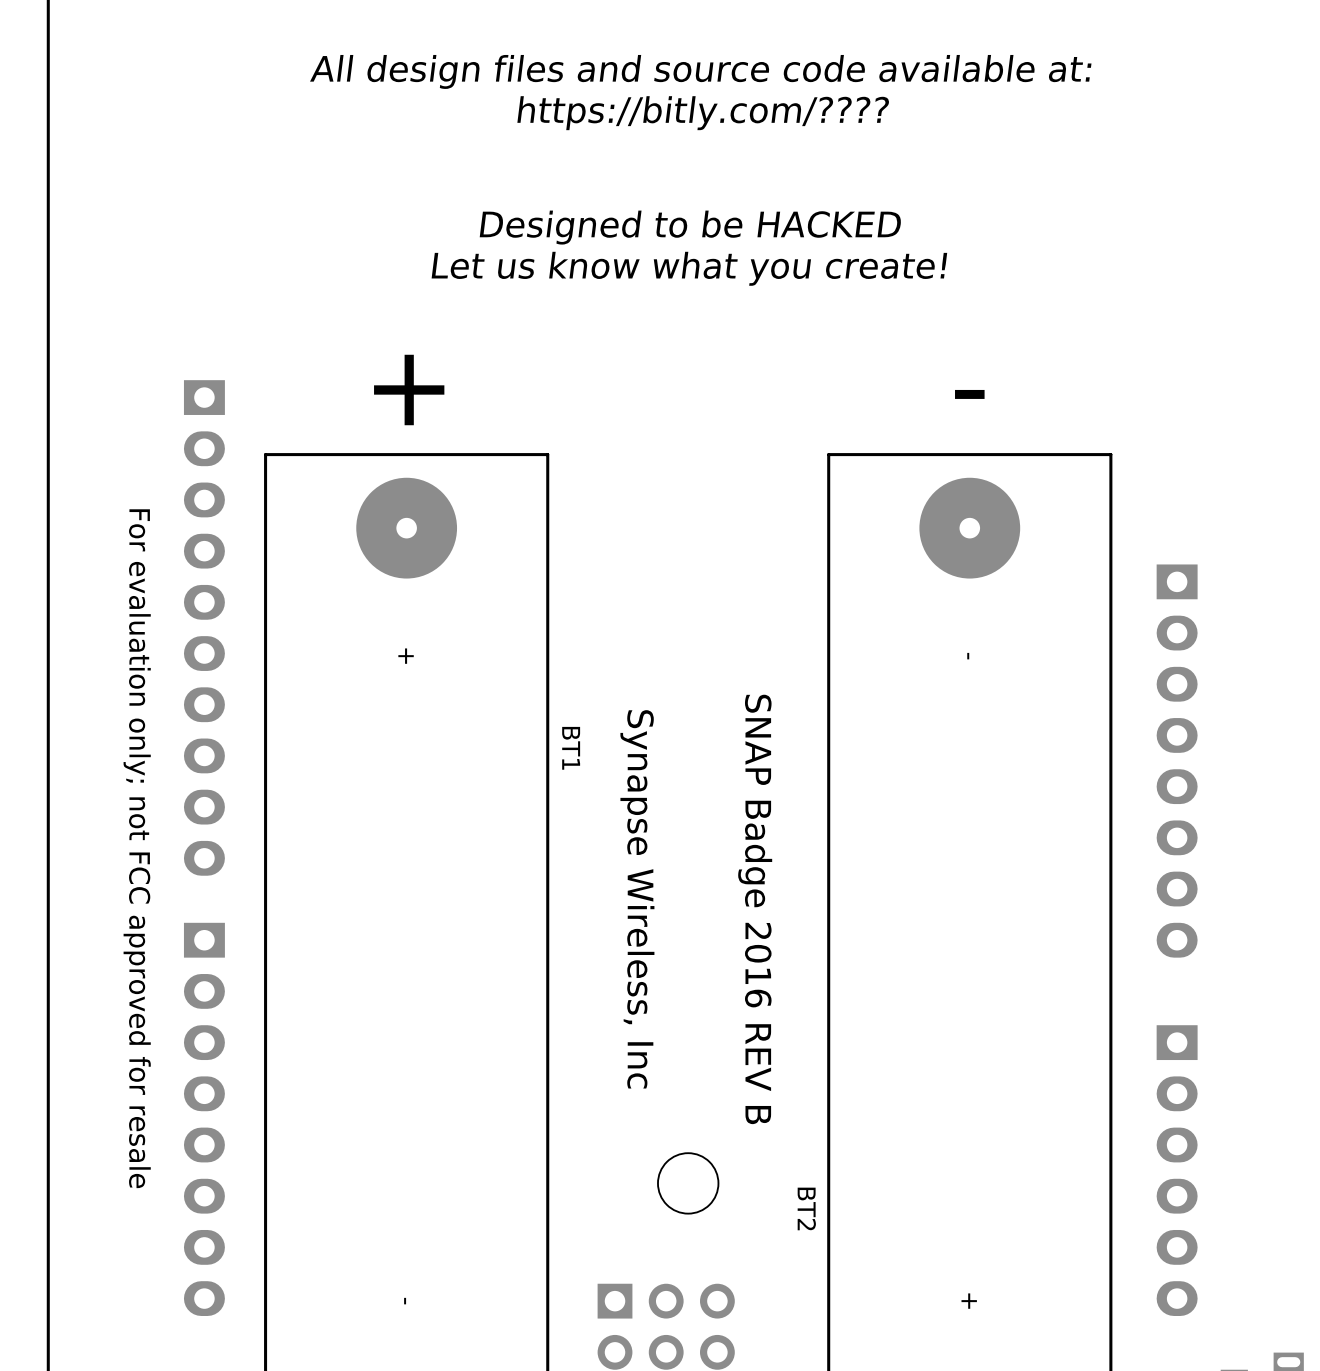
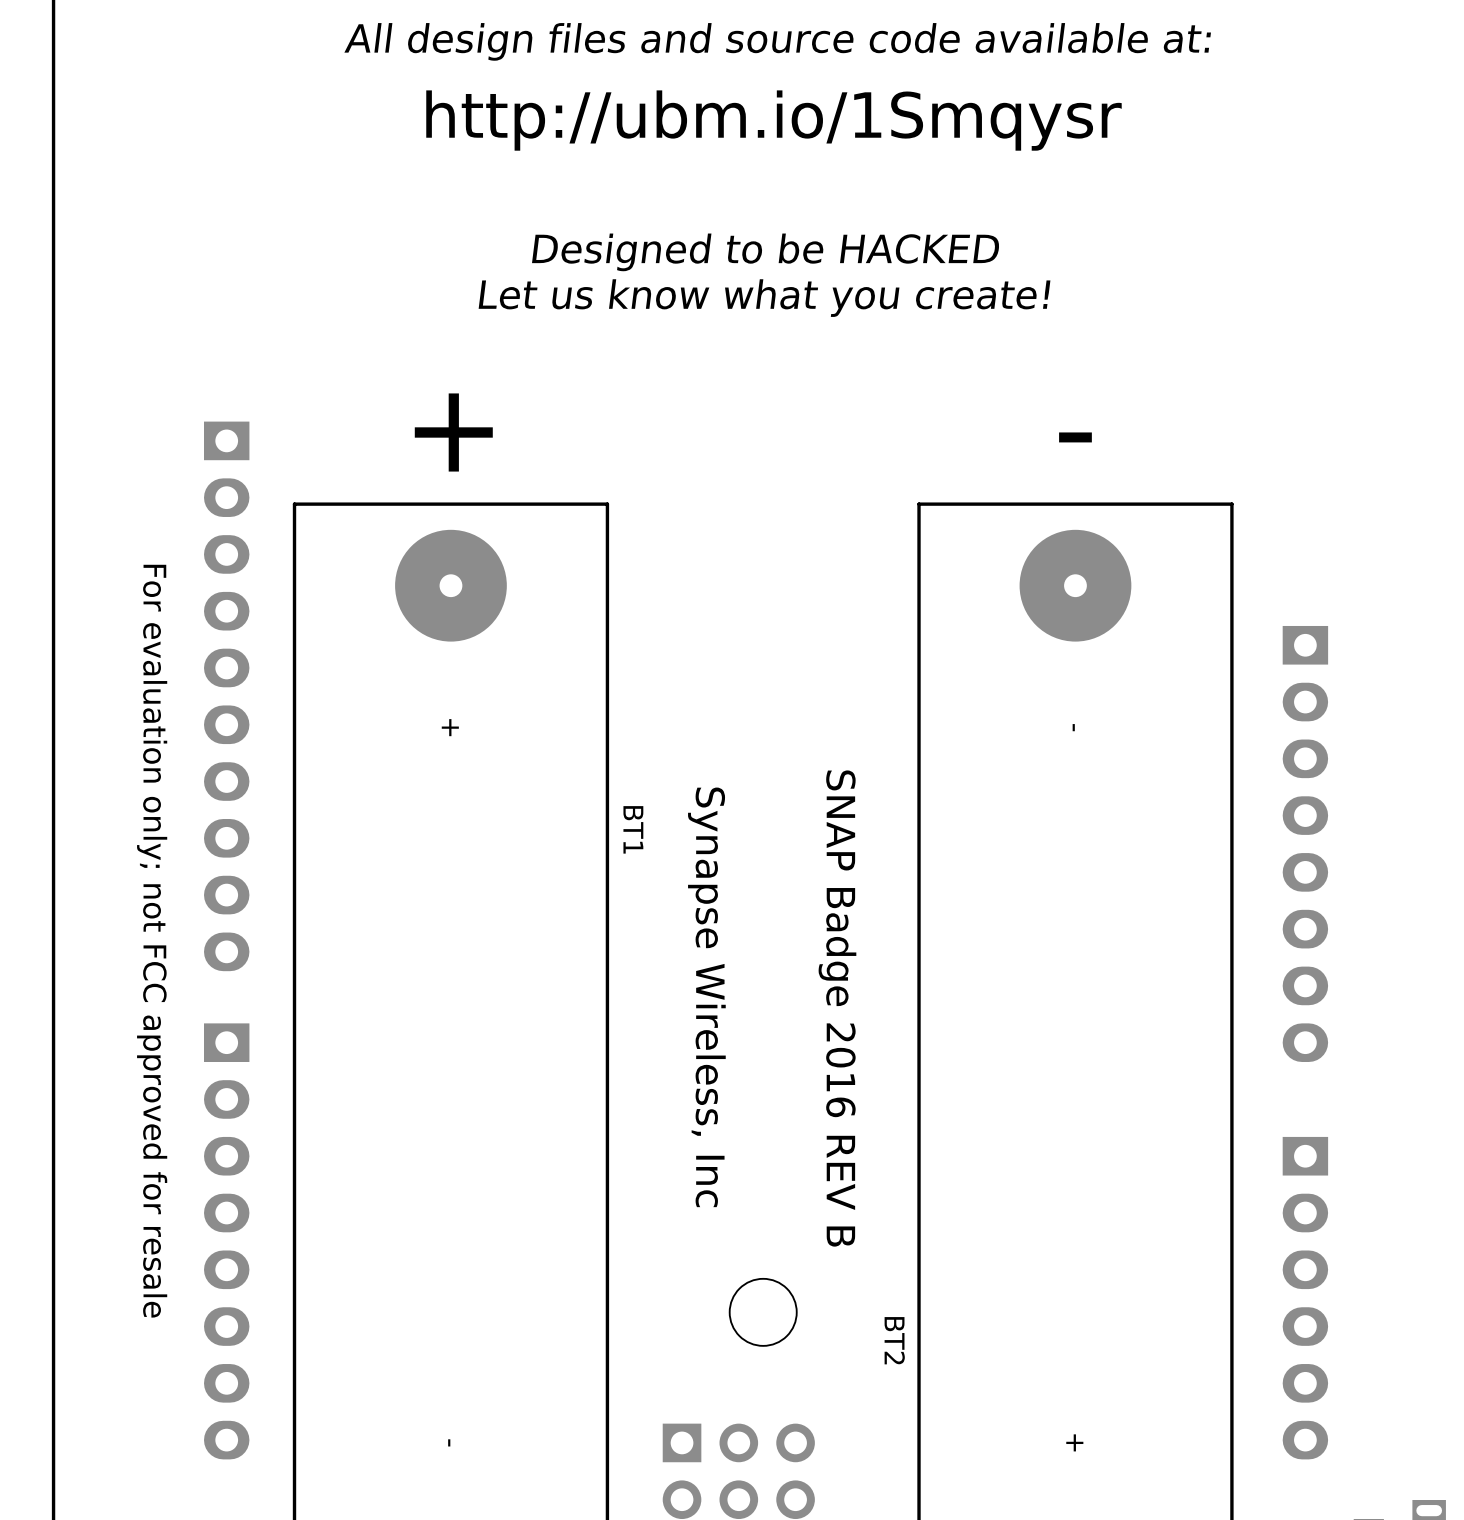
text position: All design files and source code available at: (700, 71) -> All design files and source code available at: (777, 41)
text: https://bitly.com/???? (703, 113) -> http://ubm.io/1Smqysr (773, 120)

